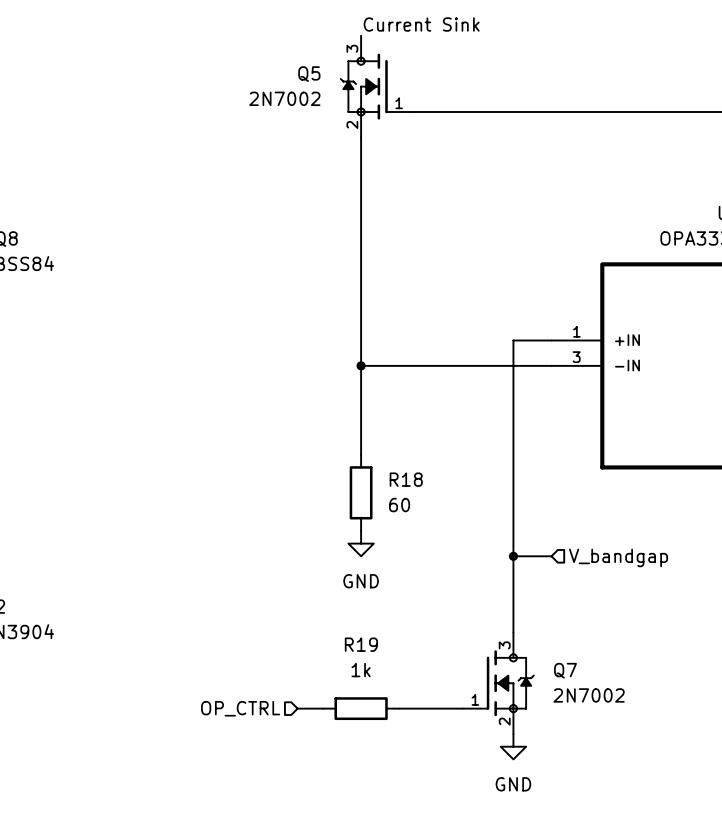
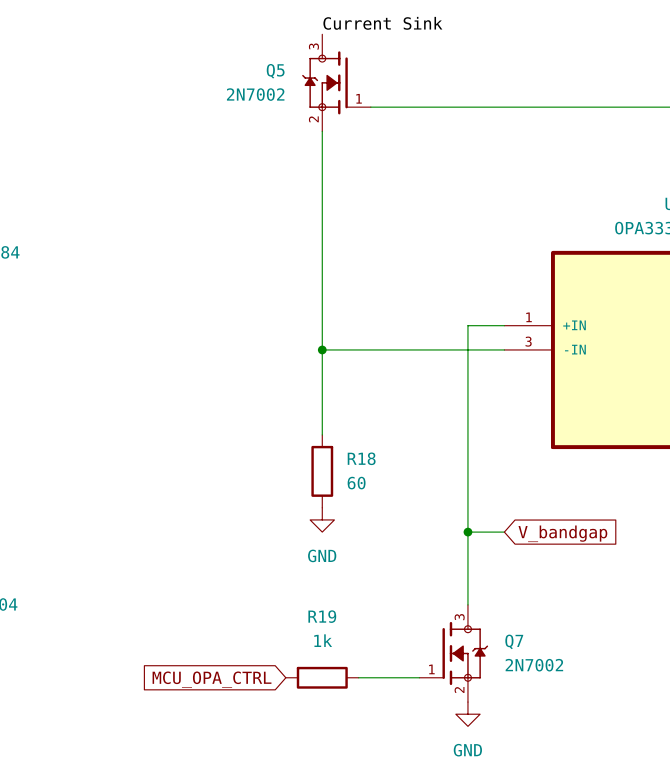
hierarchical label: V_bandgap (618, 557) -> none
global label: none -> V_bandgap (562, 533)
hierarchical label: OP_CTRL (240, 708) -> none
wire: (297, 708) (323, 708) -> none
global label: none -> MCU_OPA_CTRL (212, 679)

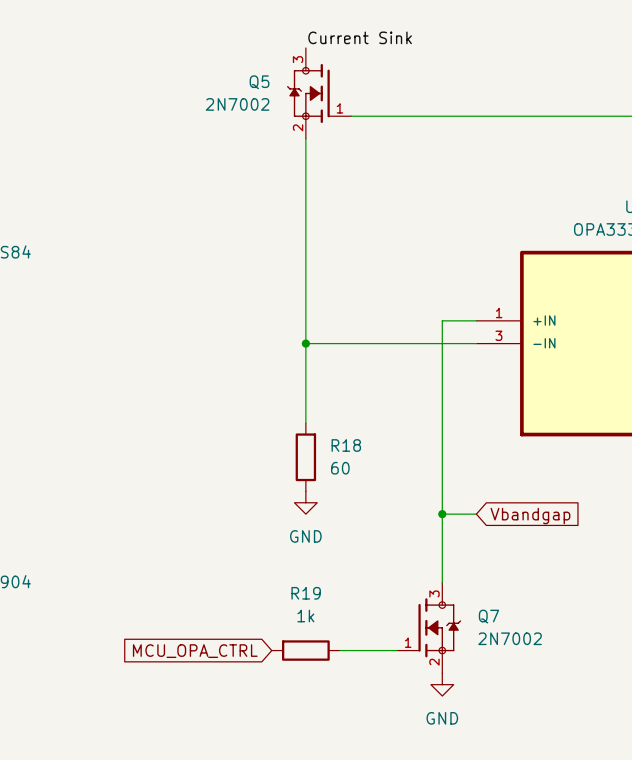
global label: V_bandgap (562, 533) -> Vbandgap (530, 516)

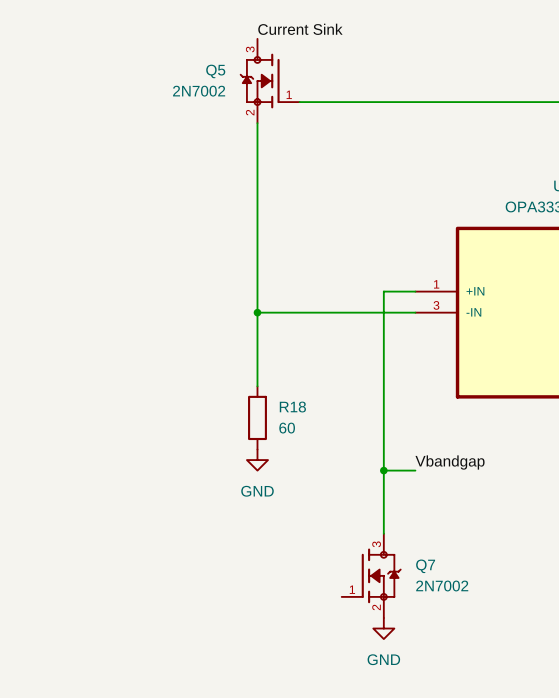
label: none -> Vbandgap (450, 462)
global label: Vbandgap (530, 516) -> none
R19: 1k (305, 650) -> none
wire: (339, 650) (396, 650) -> none
global label: MCU_OPA_CTRL (195, 651) -> none

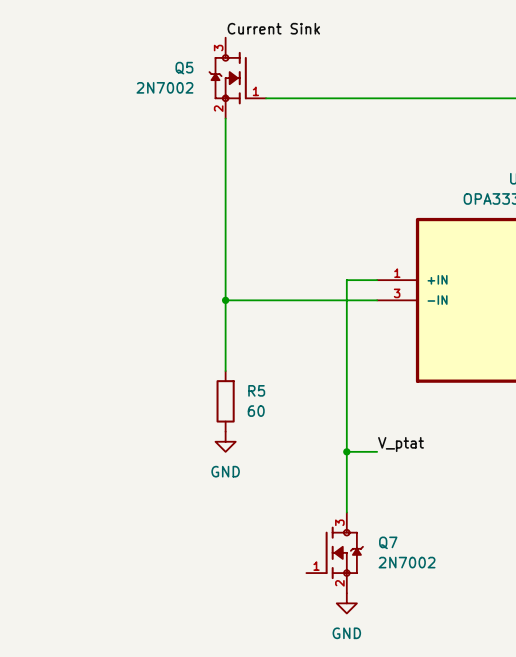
R18 name: R18 (292, 407) -> R5 (256, 390)
label: Vbandgap (450, 462) -> V_ptat (401, 444)

